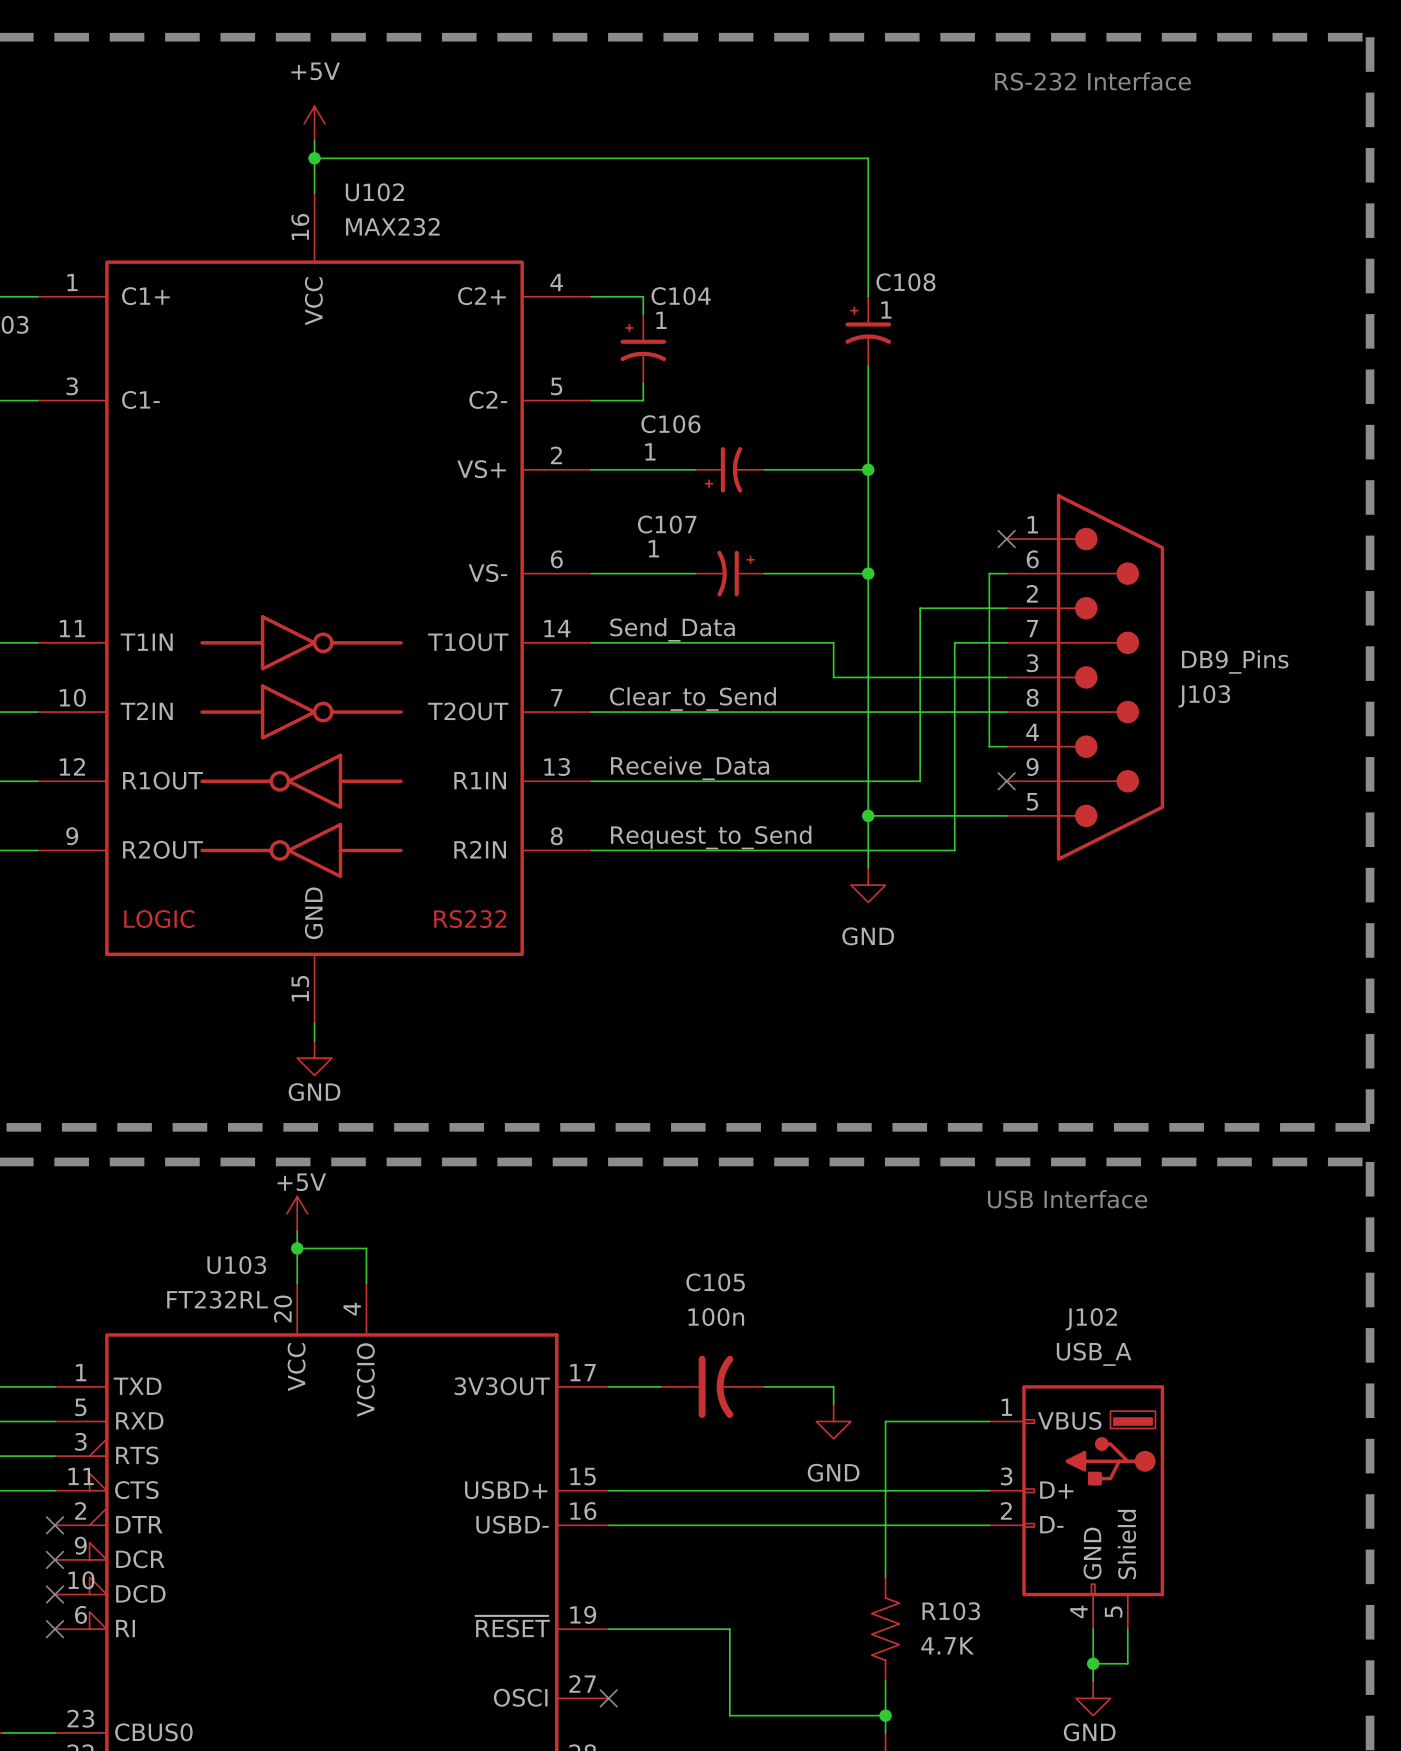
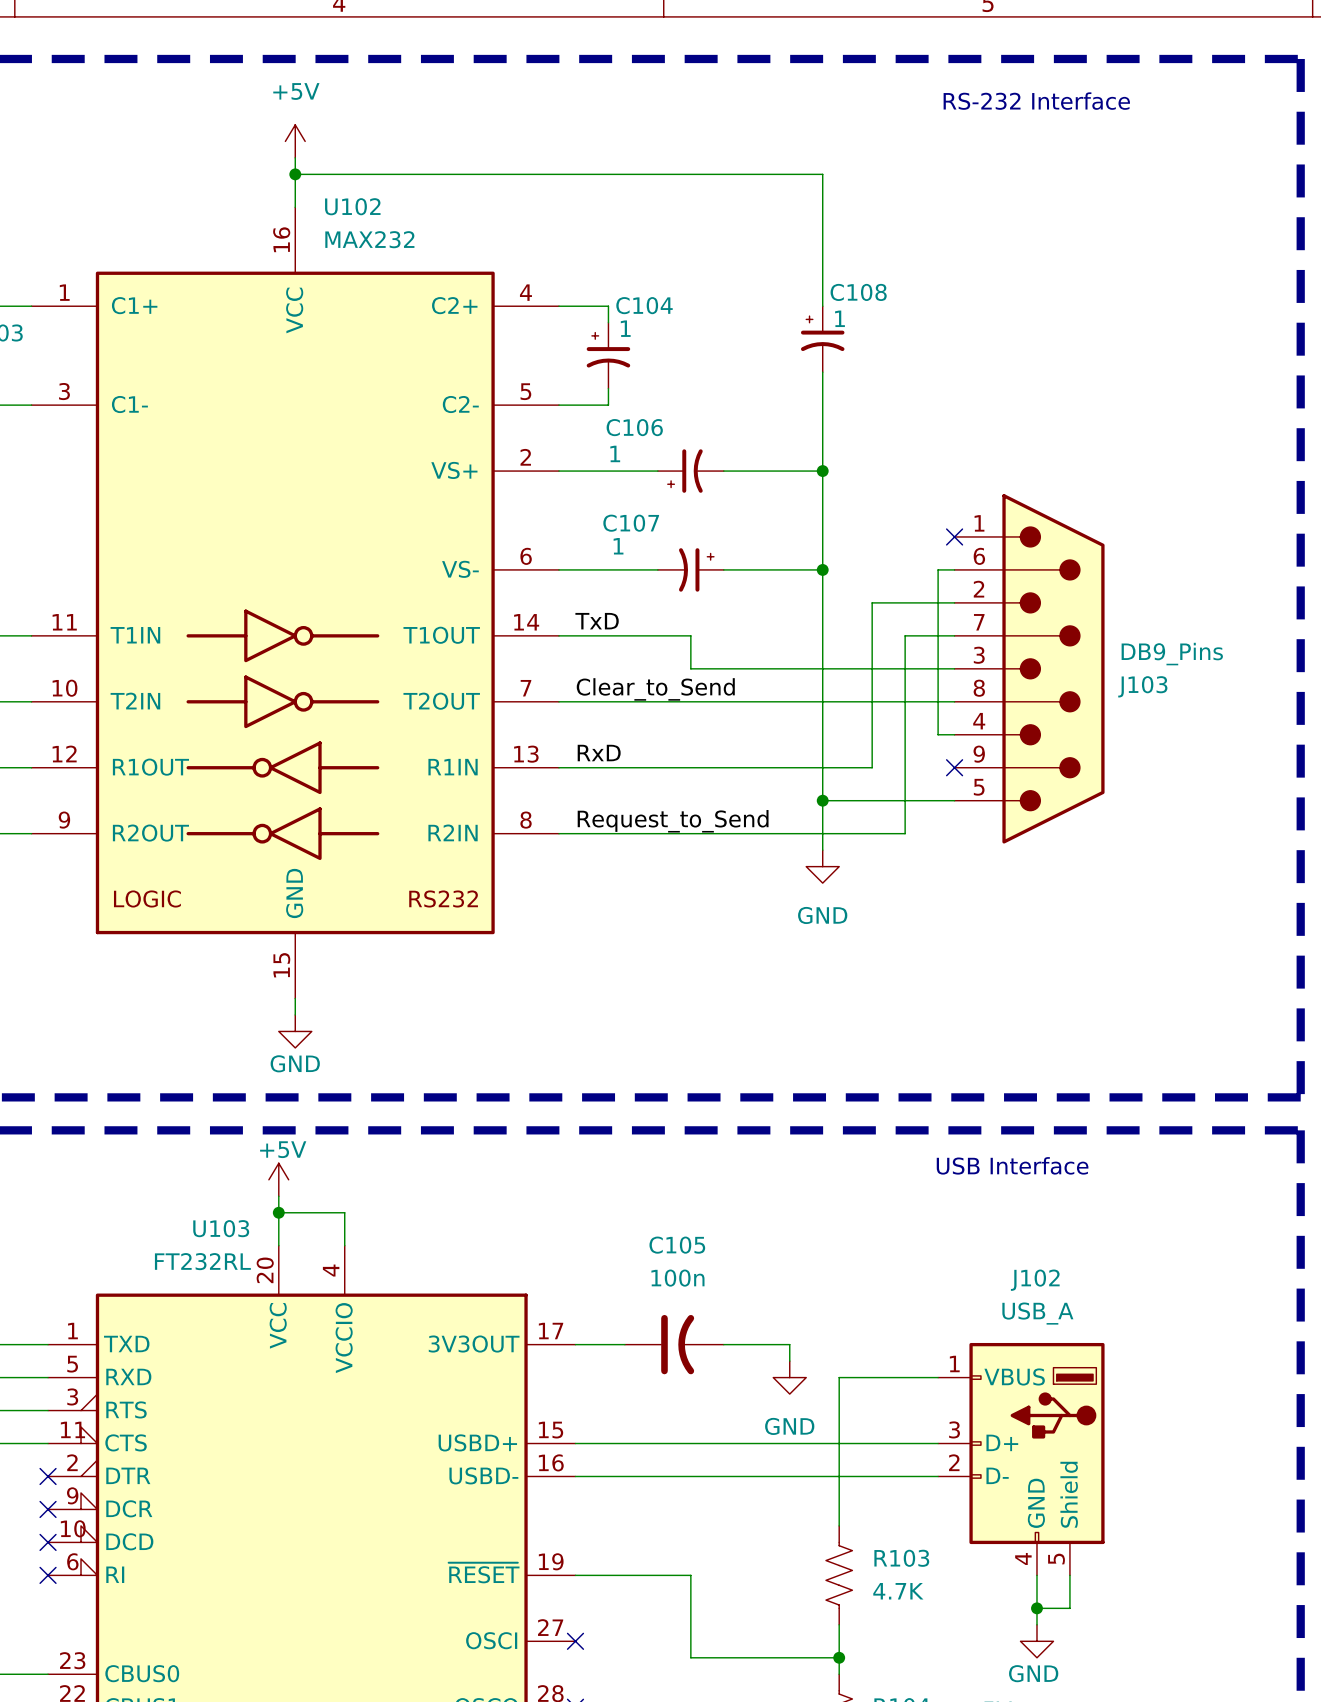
label: Send_Data (672, 629) -> TxD (597, 621)
wire: (729, 642) (833, 642) (833, 677) -> (690, 635) (690, 668) (789, 668)
label: Receive_Data (690, 768) -> RxD (599, 753)

